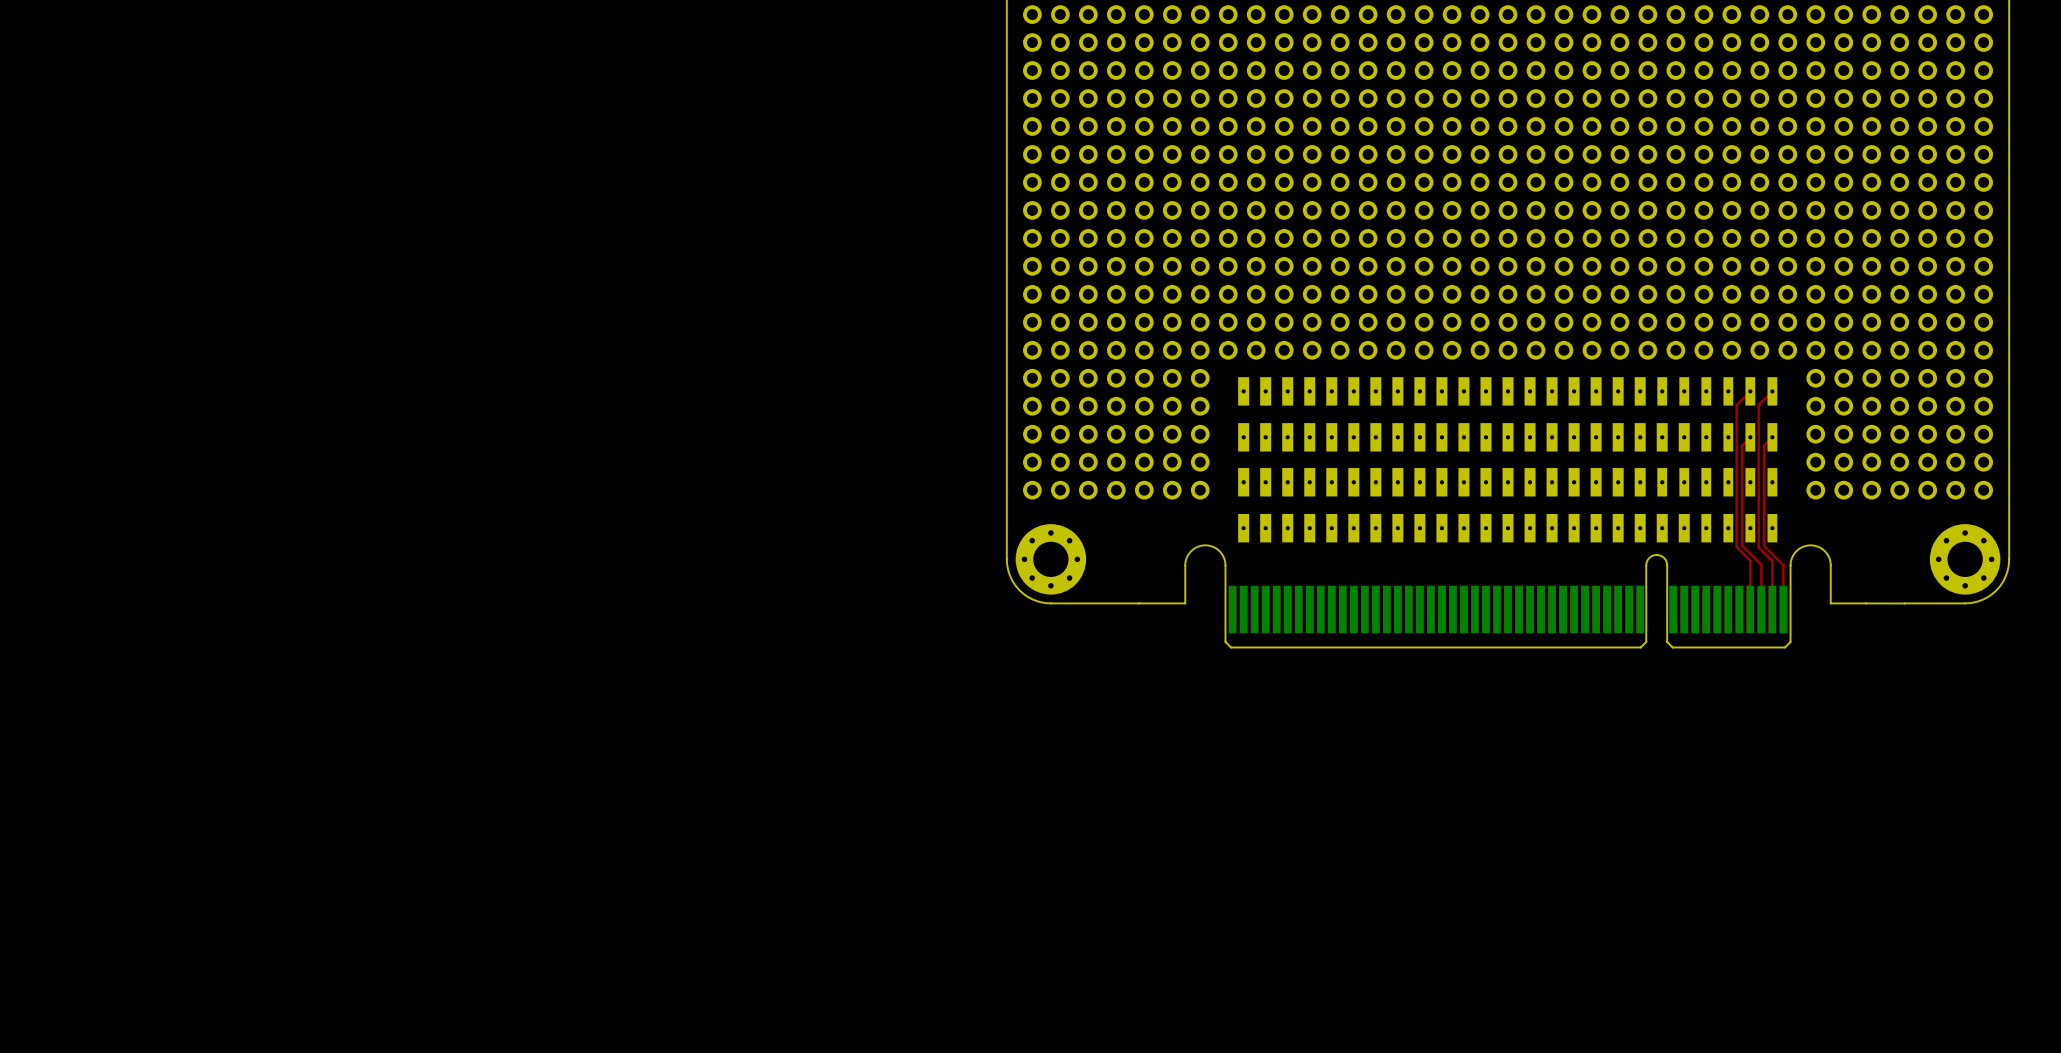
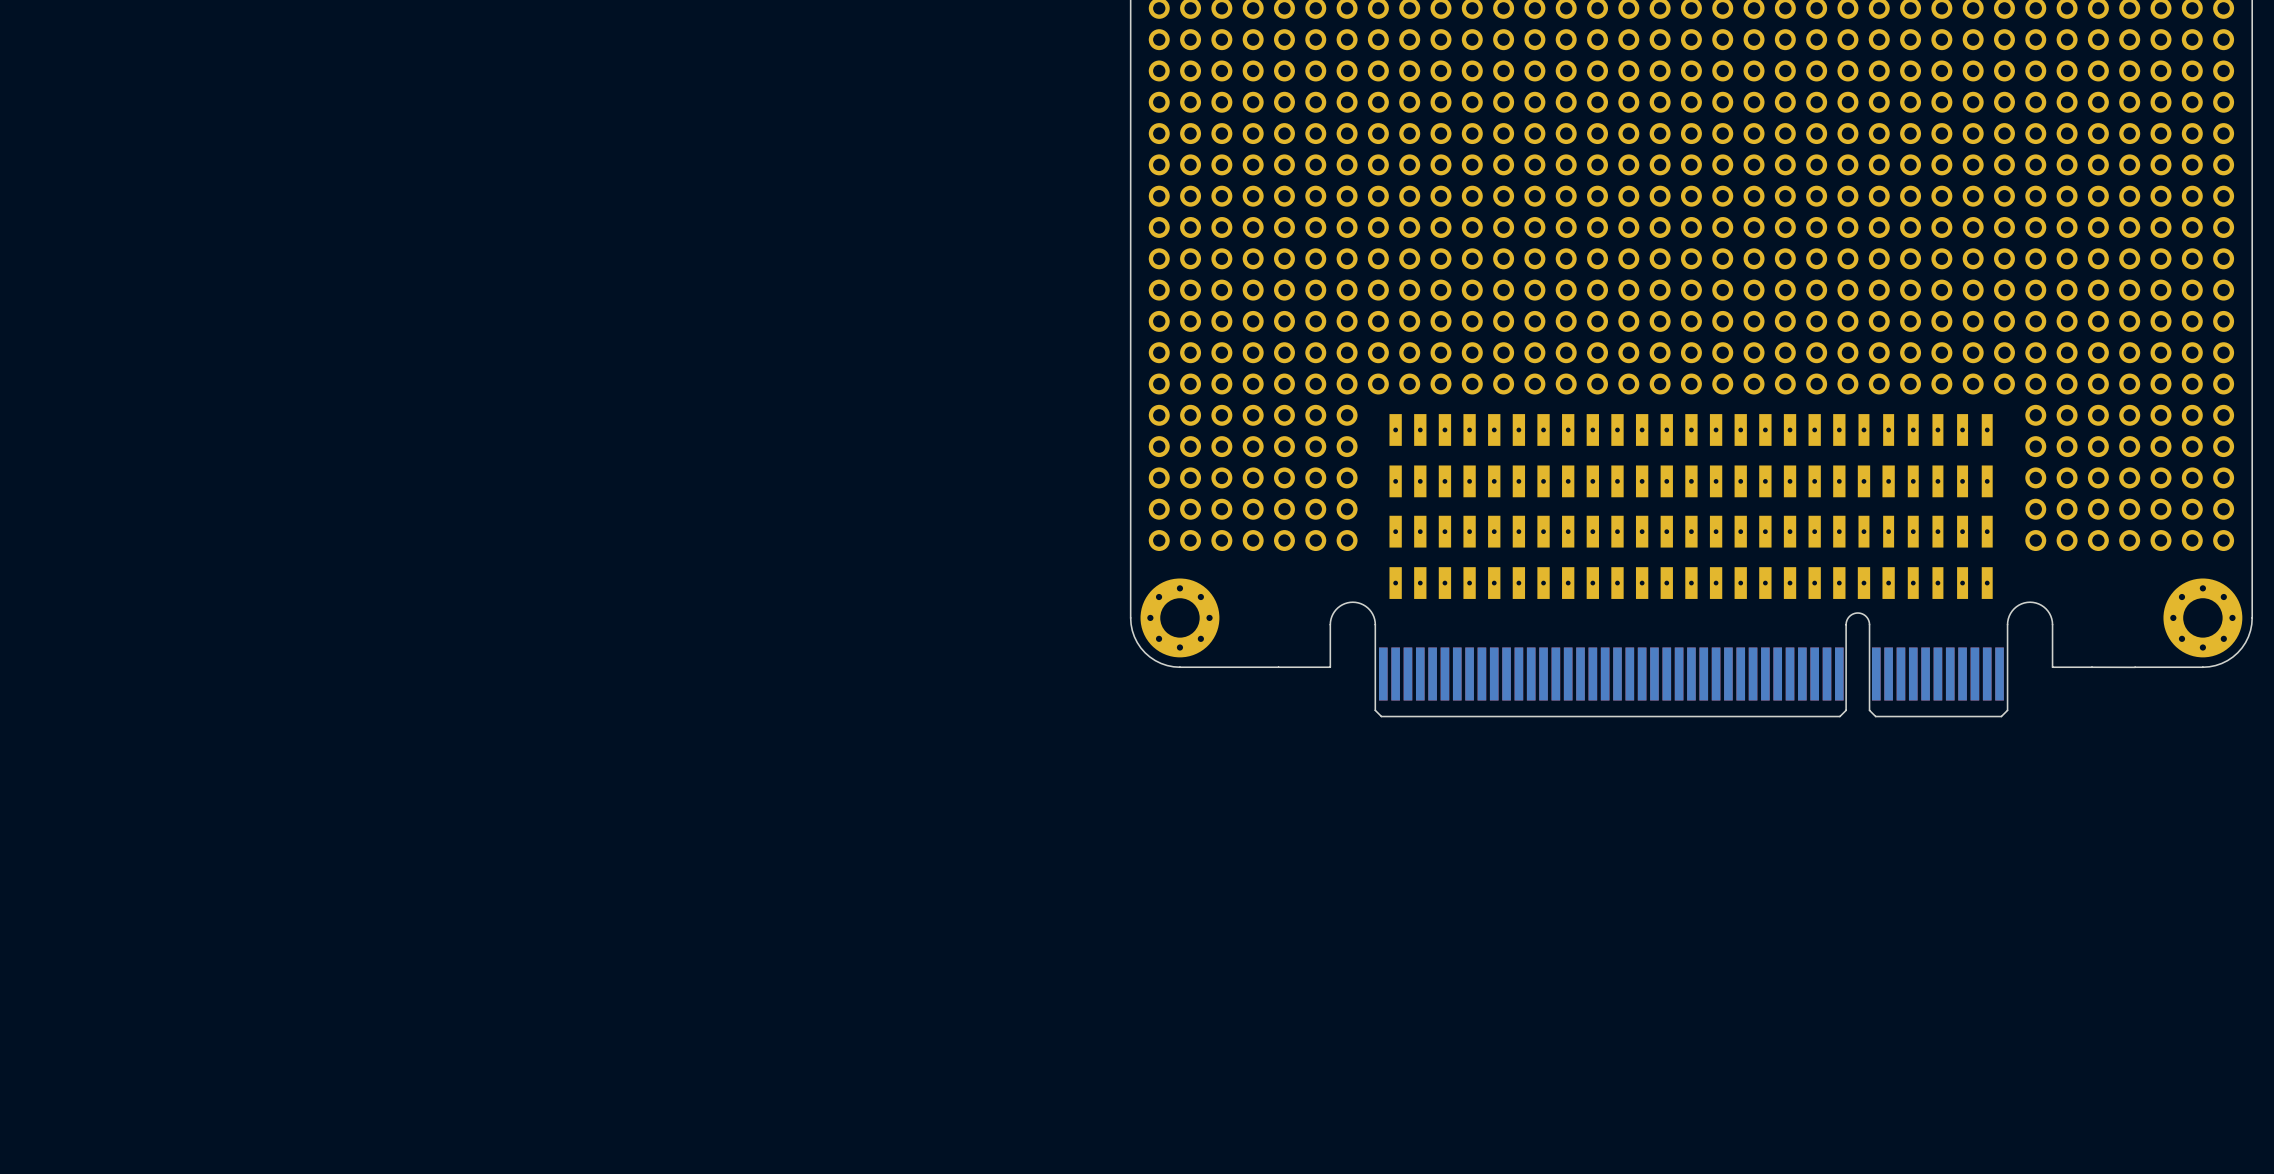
top track: (1750, 391) (1736, 405) (1736, 546) (1750, 560) (1750, 609) -> none
top track: (1772, 391) (1758, 405) (1758, 547) (1772, 560) (1772, 609) -> none
top track: (1750, 437) (1741, 445) (1741, 545) (1761, 564) (1761, 609) -> none
top track: (1772, 437) (1764, 445) (1764, 545) (1783, 565) (1783, 609) -> none

